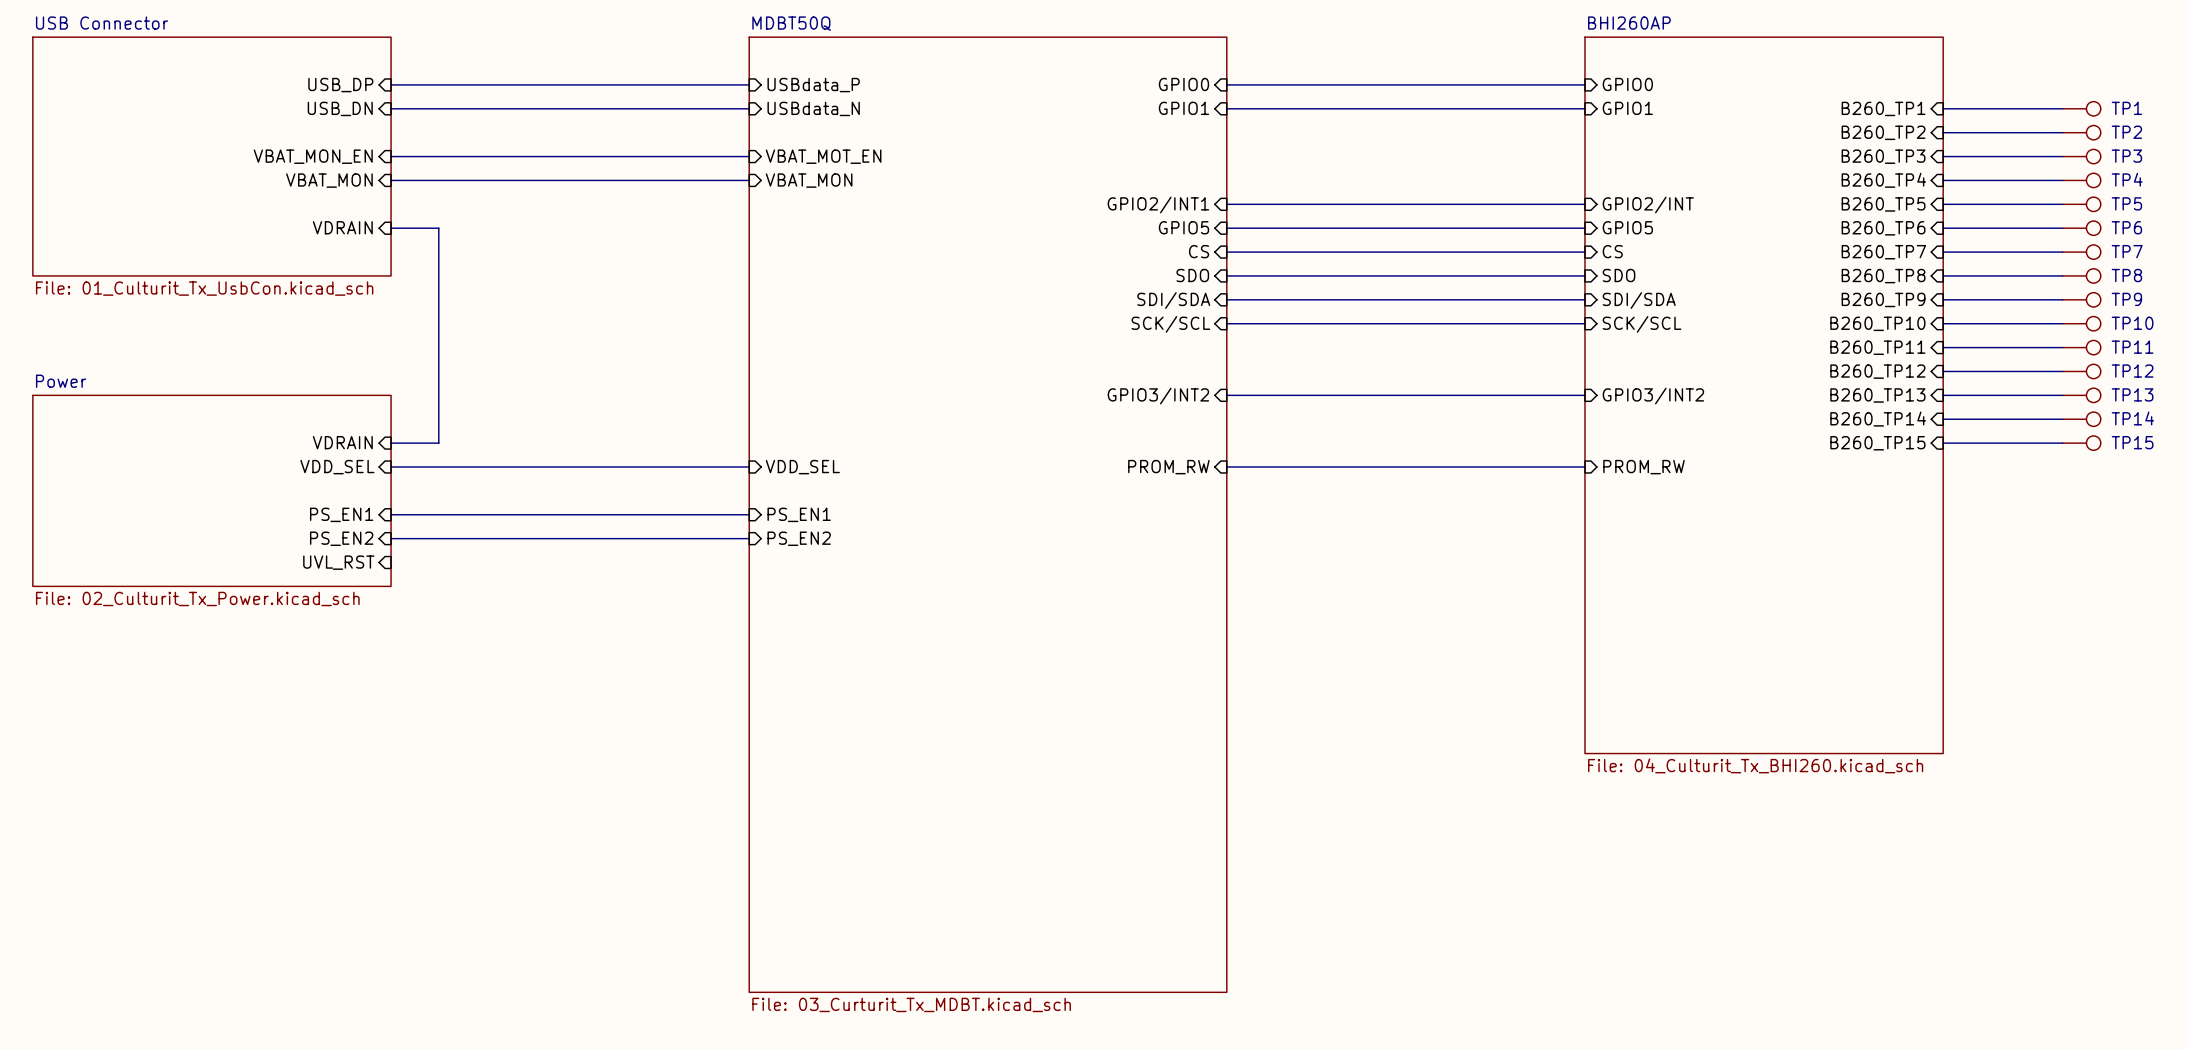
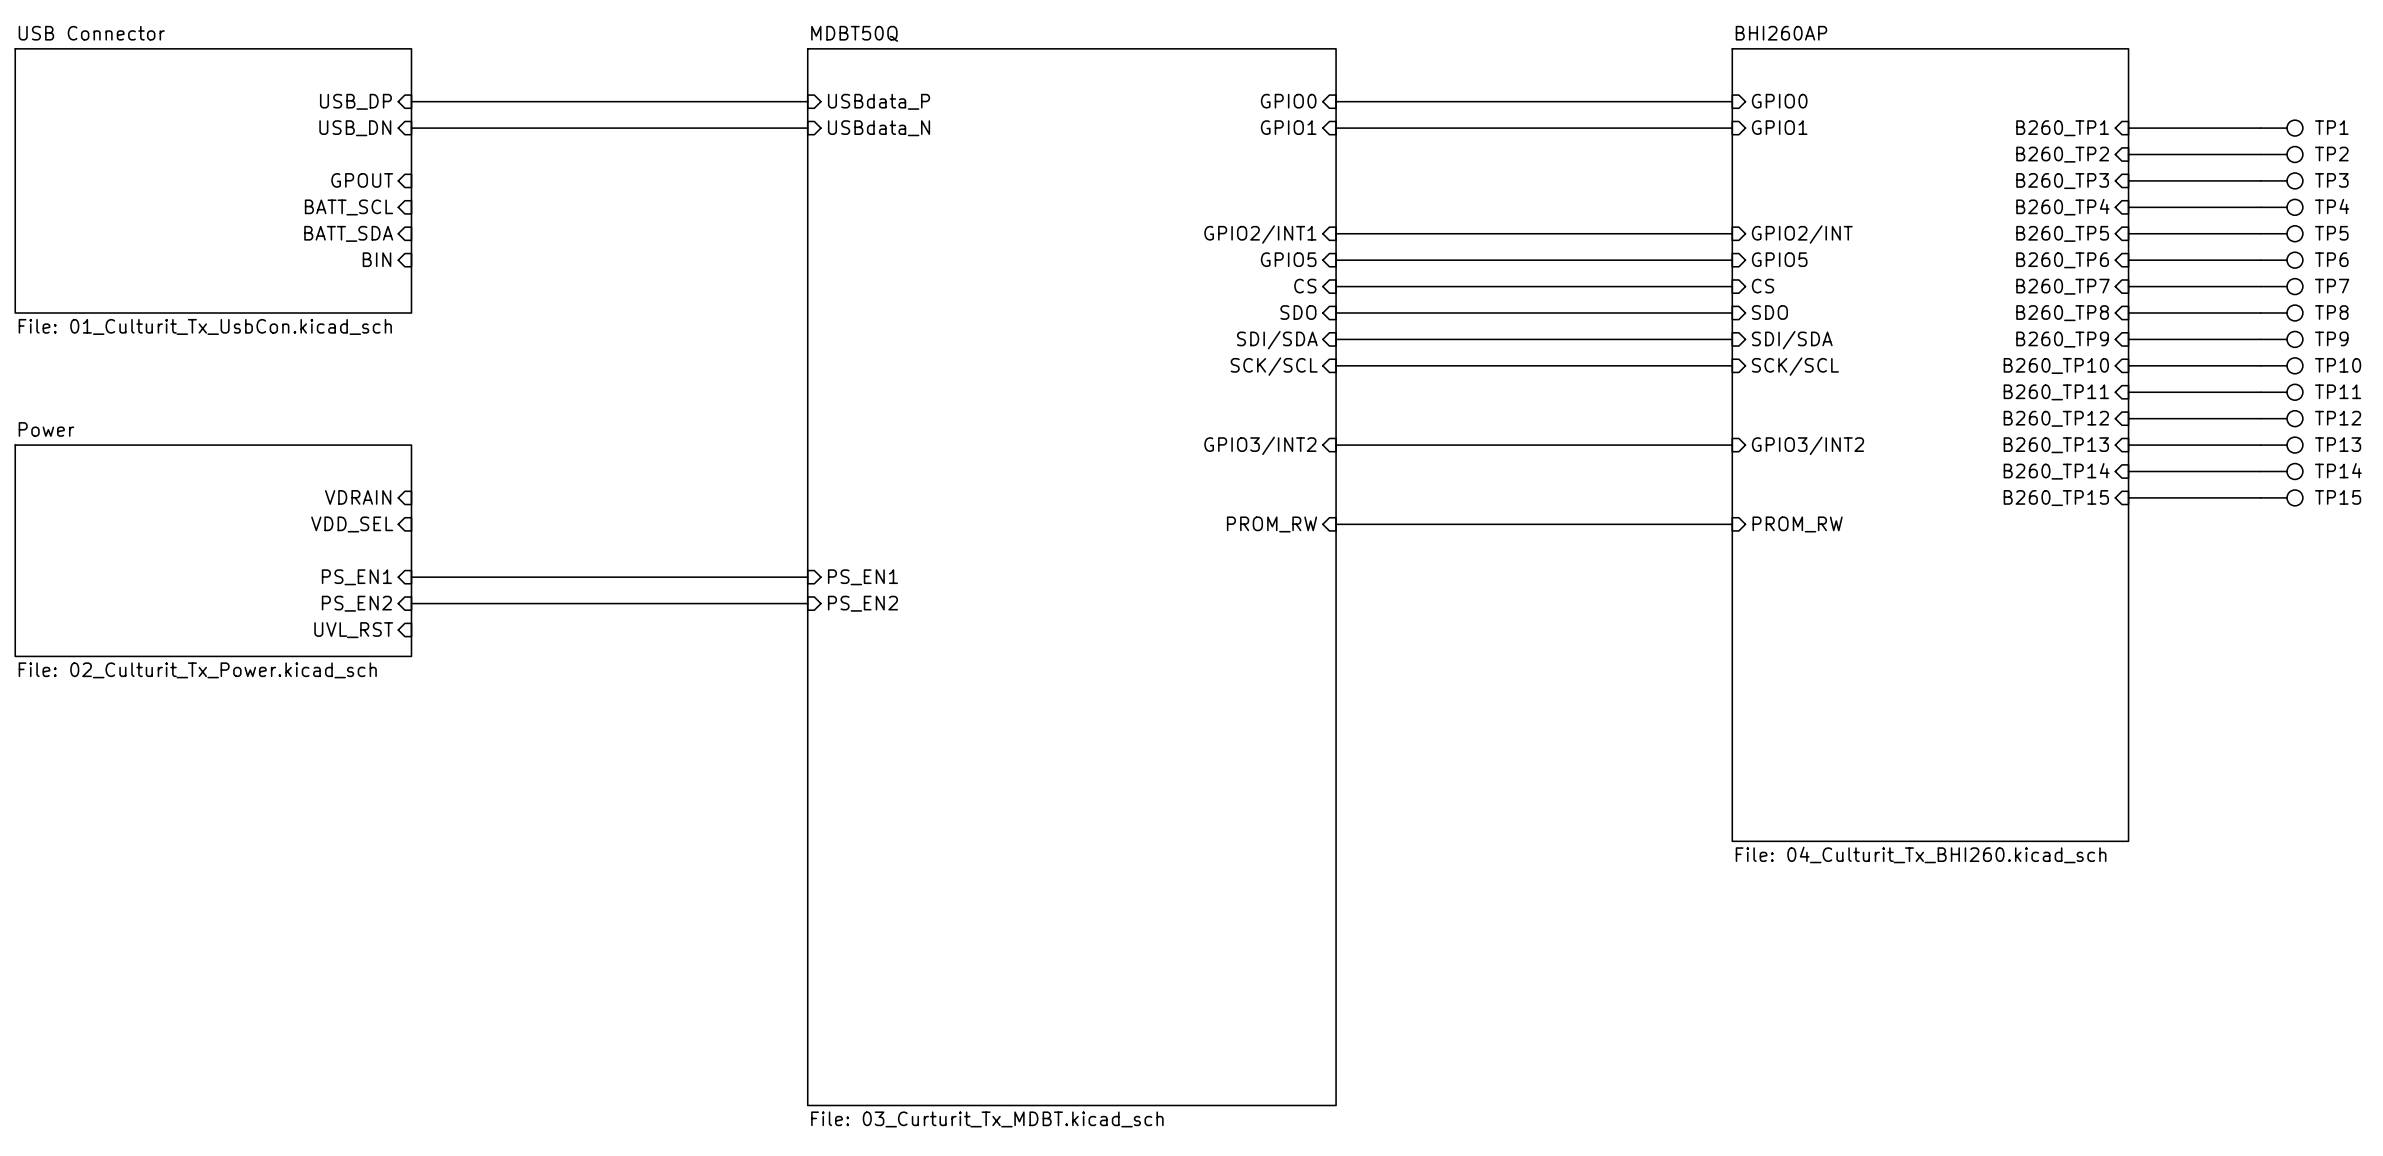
sheet pin: VBAT_MON_EN (313, 156) -> GPOUT (362, 180)
wire: (391, 156) (749, 156) -> none
sheet pin: VBAT_MOT_EN (823, 156) -> none
sheet pin: VBAT_MON (329, 180) -> BATT_SCL (349, 207)
wire: (391, 180) (749, 180) -> none
sheet pin: VBAT_MON (809, 180) -> none
sheet pin: none -> BATT_SDA (348, 233)
sheet pin: VDRAIN (342, 227) -> BIN (377, 259)
wire: (391, 228) (438, 228) (438, 443) (391, 443) -> none
wire: (391, 466) (749, 466) -> none
sheet pin: VDD_SEL (802, 467) -> none

